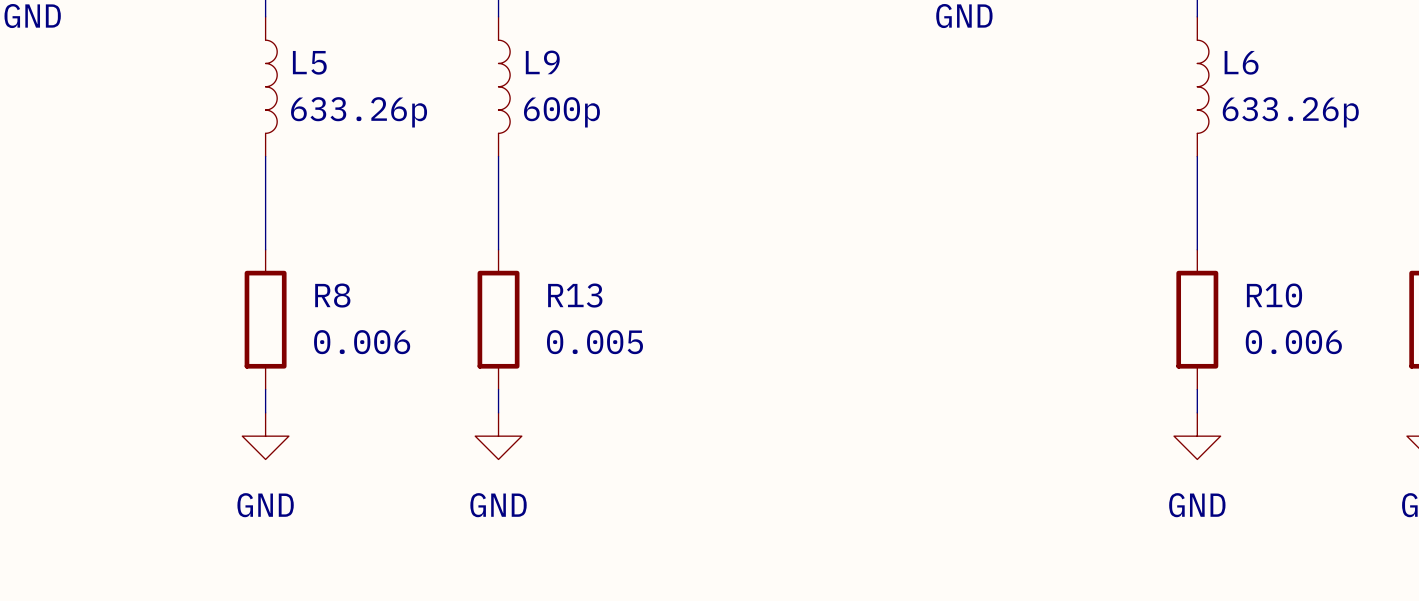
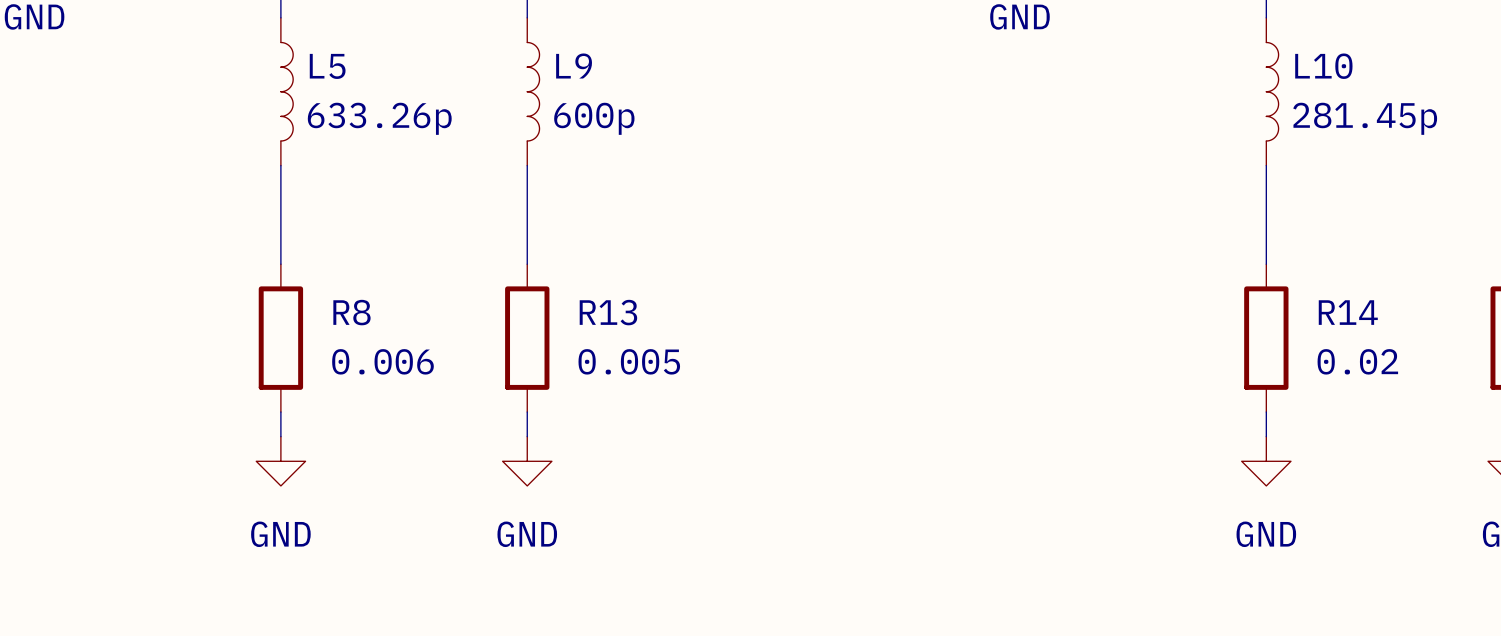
L6 name: L6 (1241, 62) -> L10 (1323, 66)
L6 value: 633.26p (1290, 112) -> 281.45p (1365, 118)
R10 name: R10 (1274, 295) -> R14 (1348, 312)
R10 value: 0.006 (1293, 342) -> 0.02 (1357, 361)

